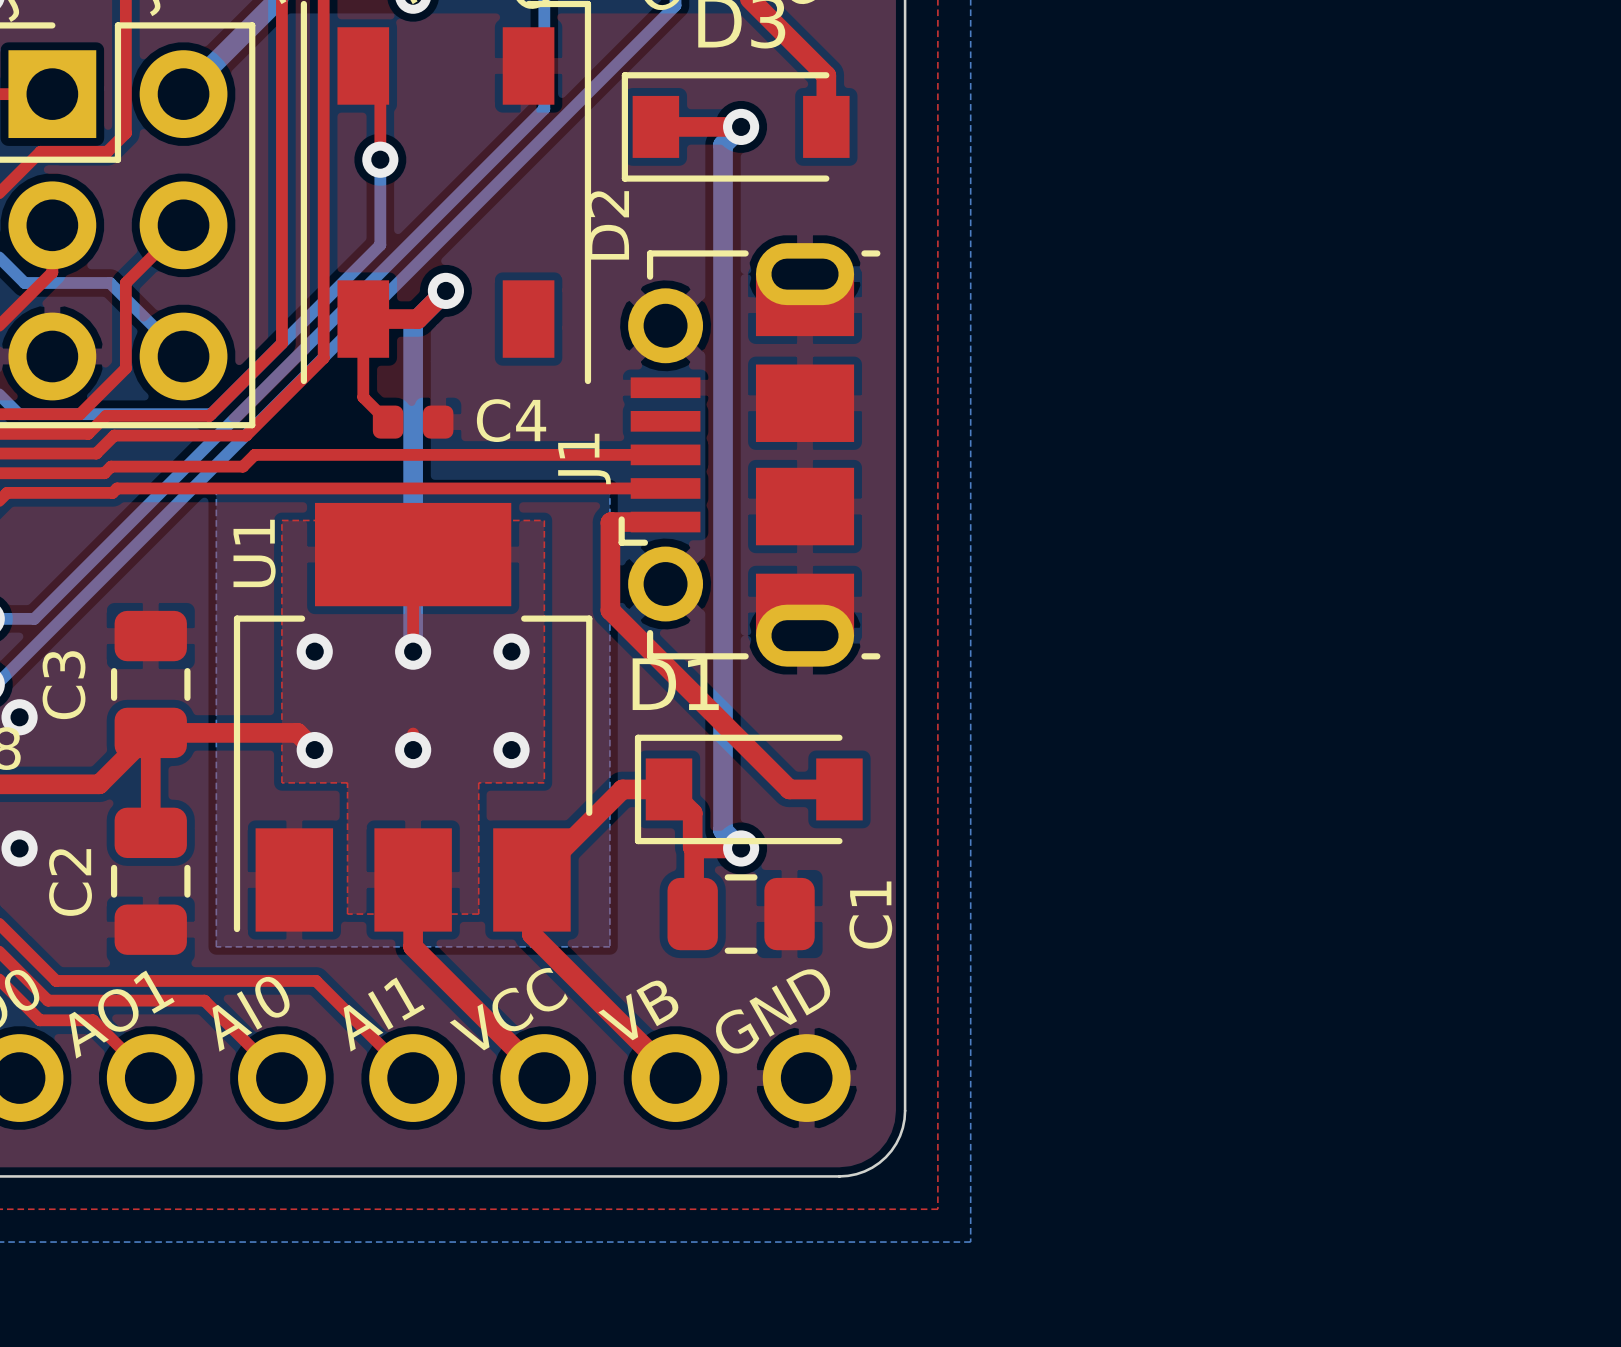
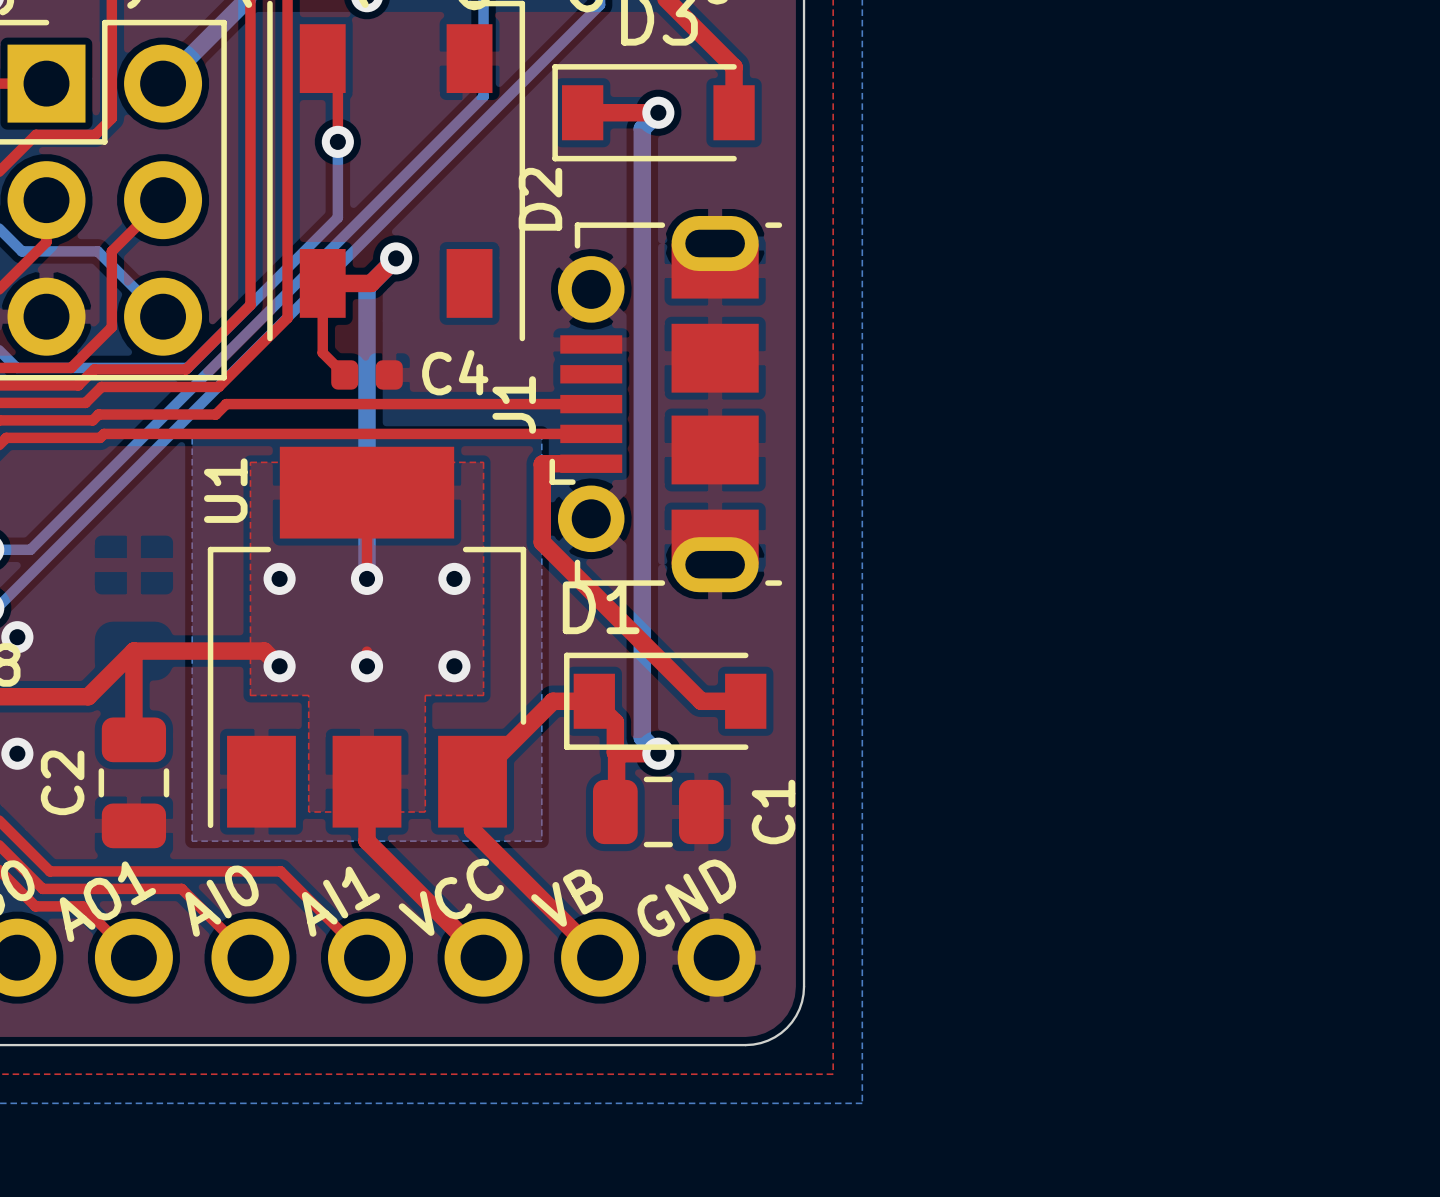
C3: (150, 684) -> none

